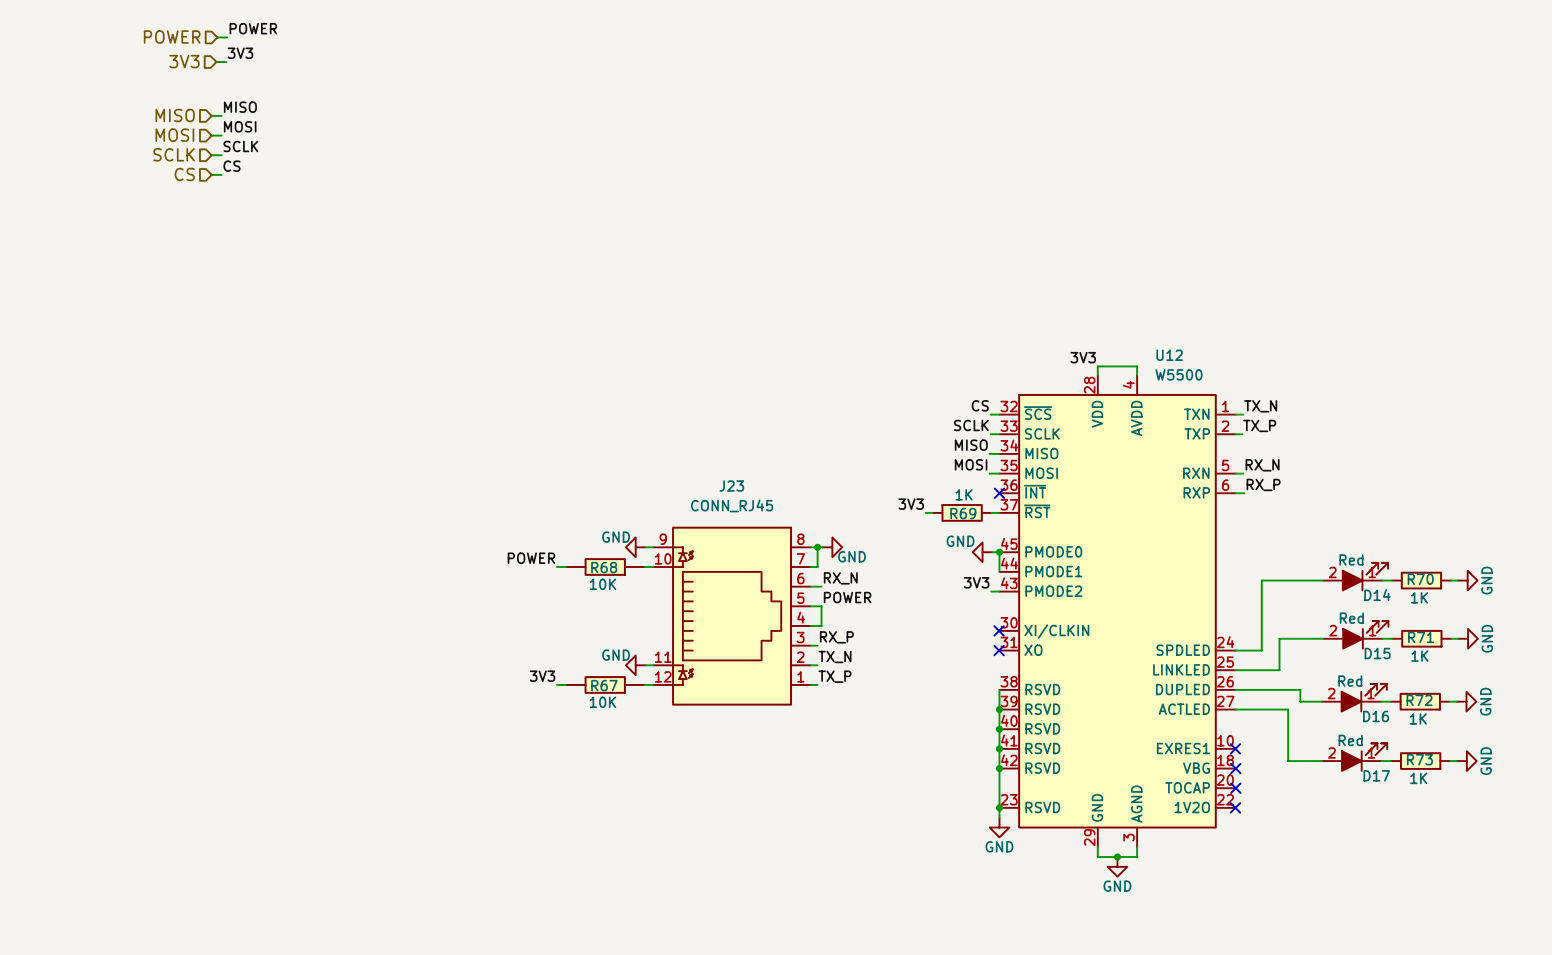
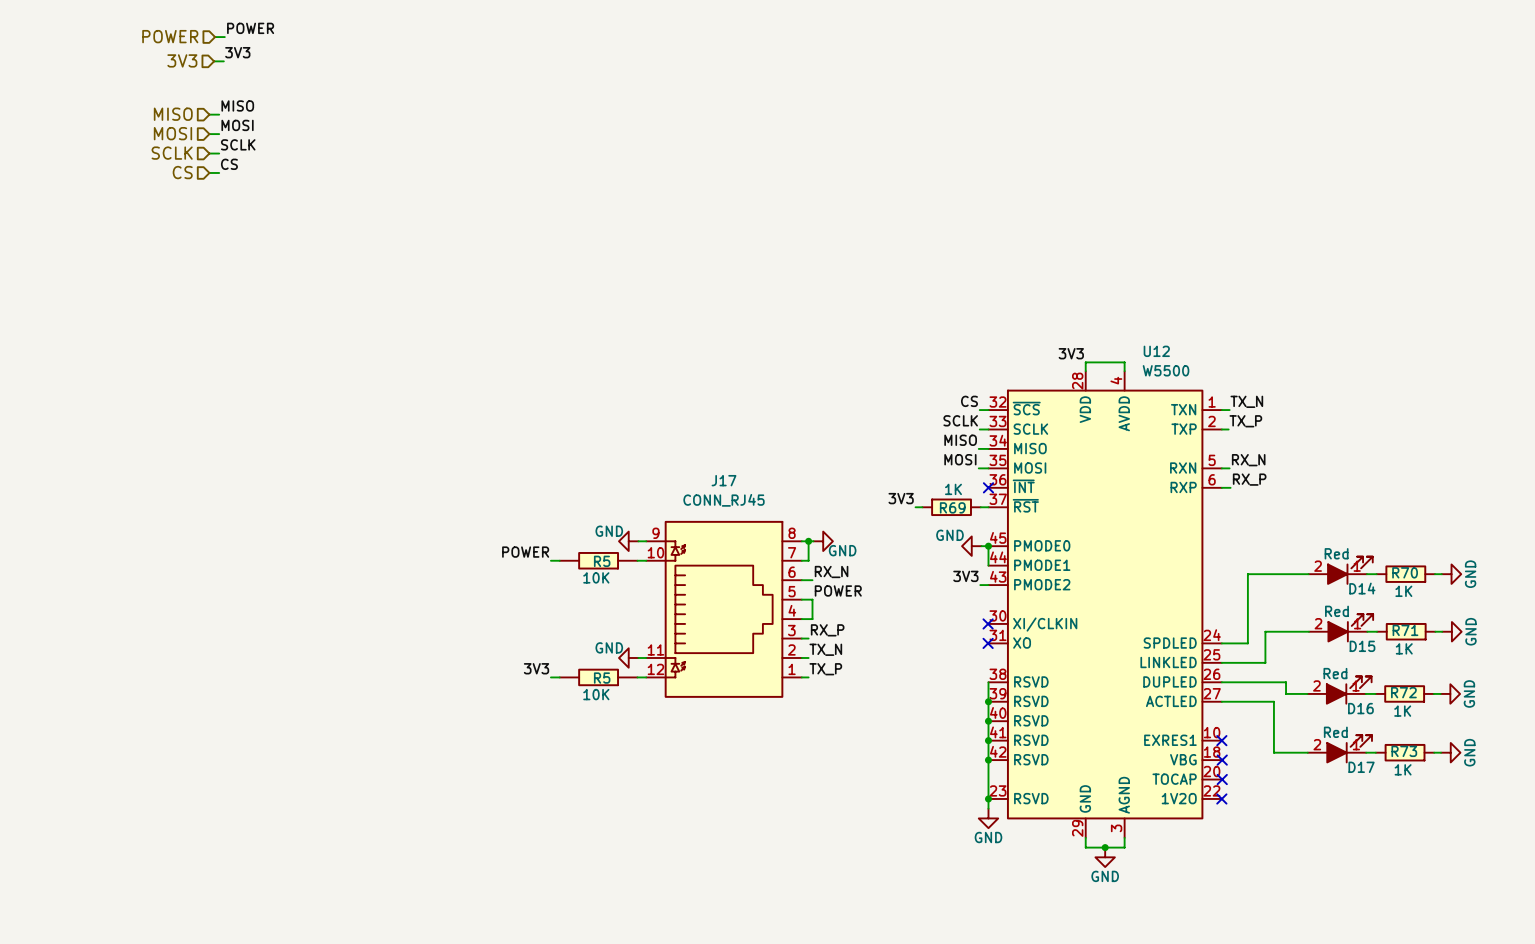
J23 name: J23 (731, 486) -> J17 (724, 480)
R68 name: R68 (604, 567) -> R5 (602, 561)
R67 name: R67 (604, 685) -> R5 (602, 678)

